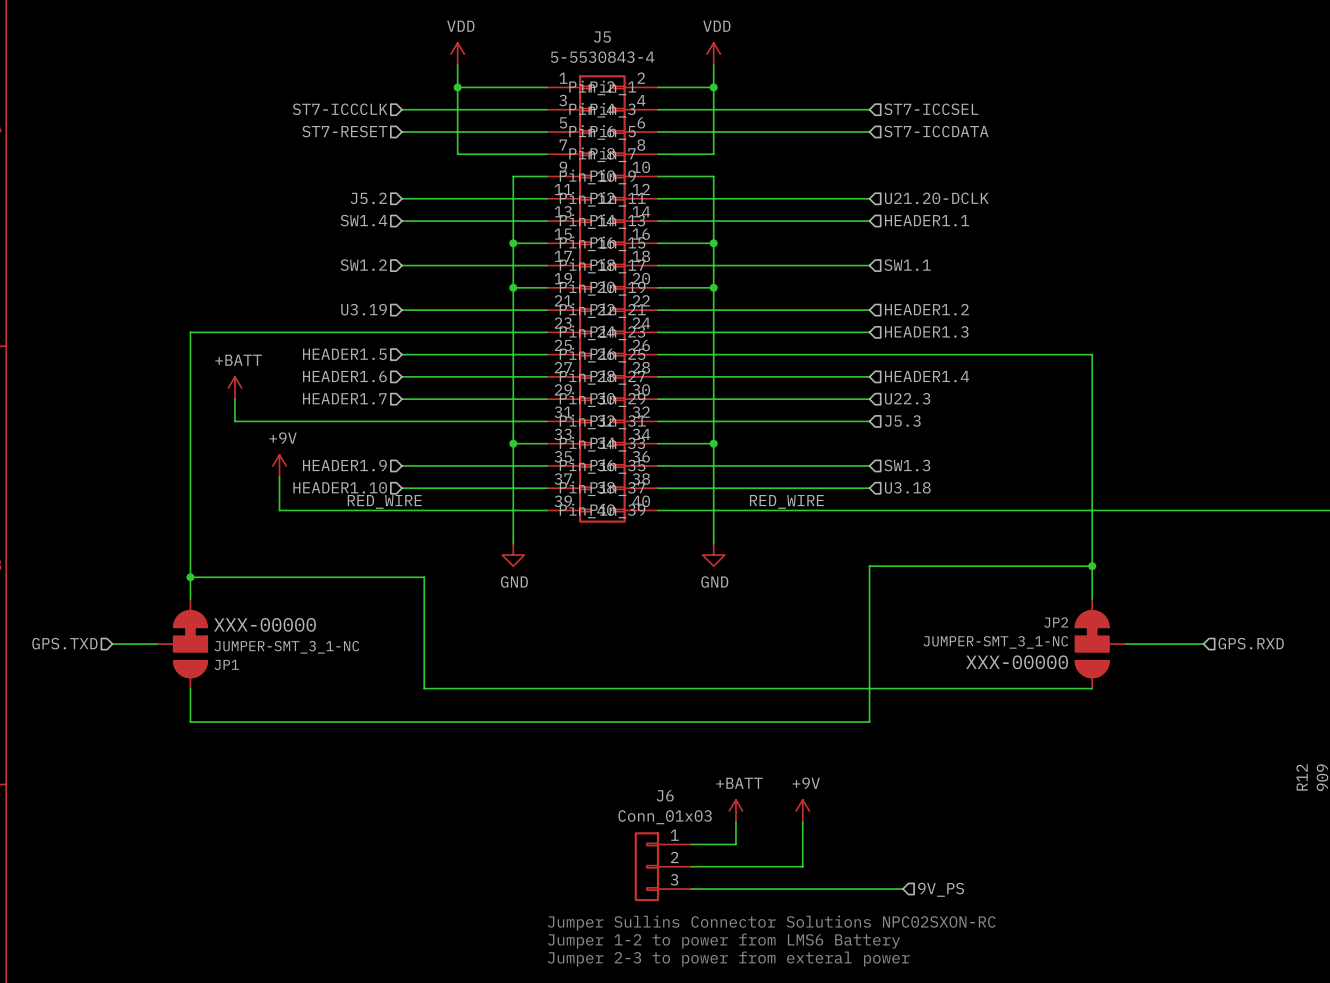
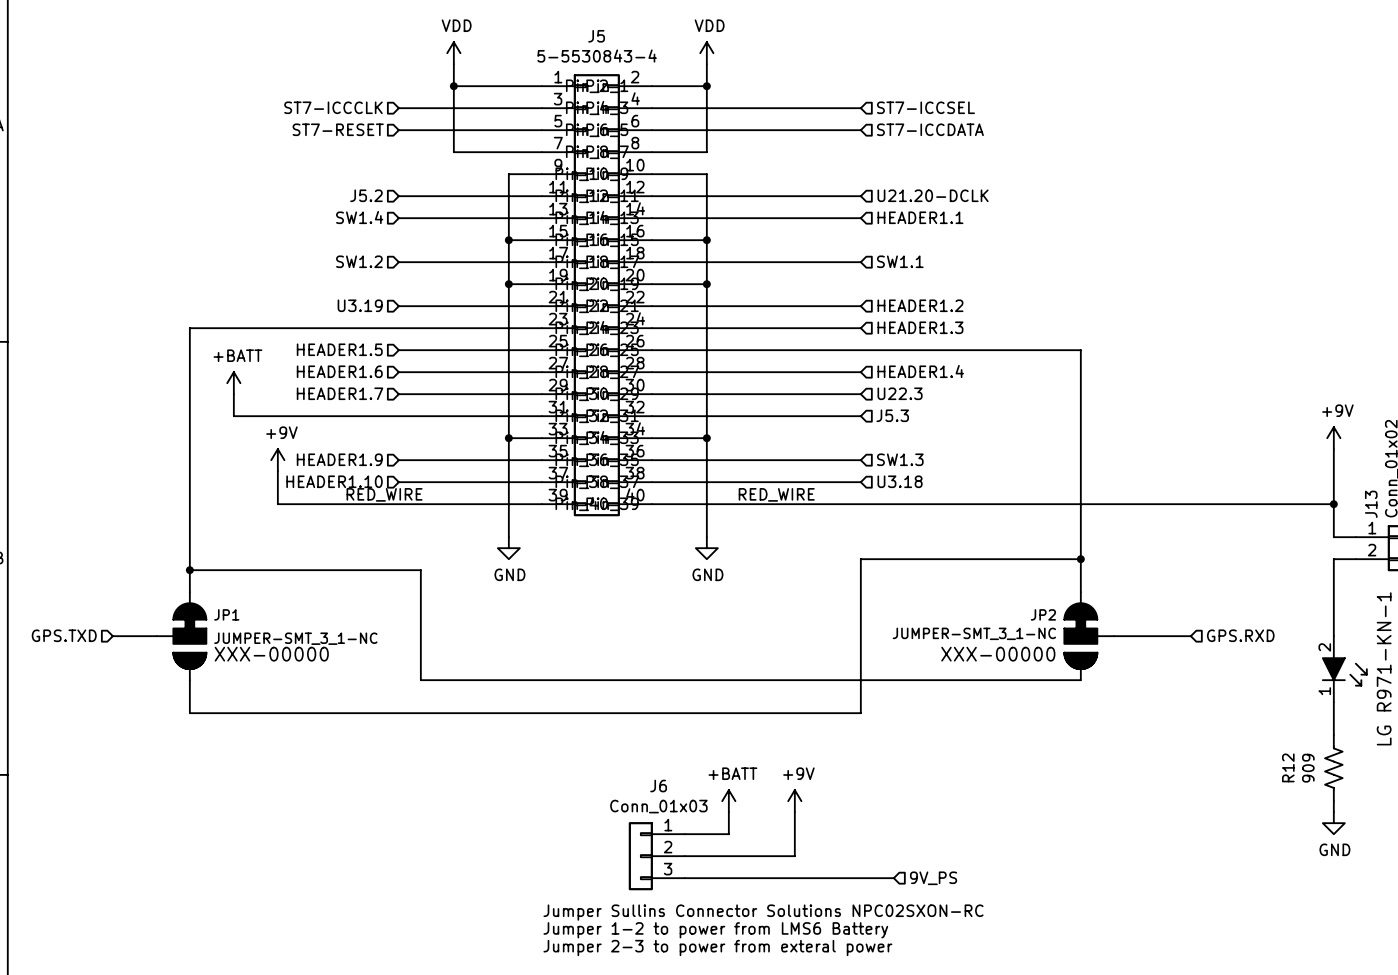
JP1 text position: XXX-00000 (265, 624) -> XXX-00000 (271, 654)
JP1 name position: JP1 (226, 664) -> JP1 (226, 614)

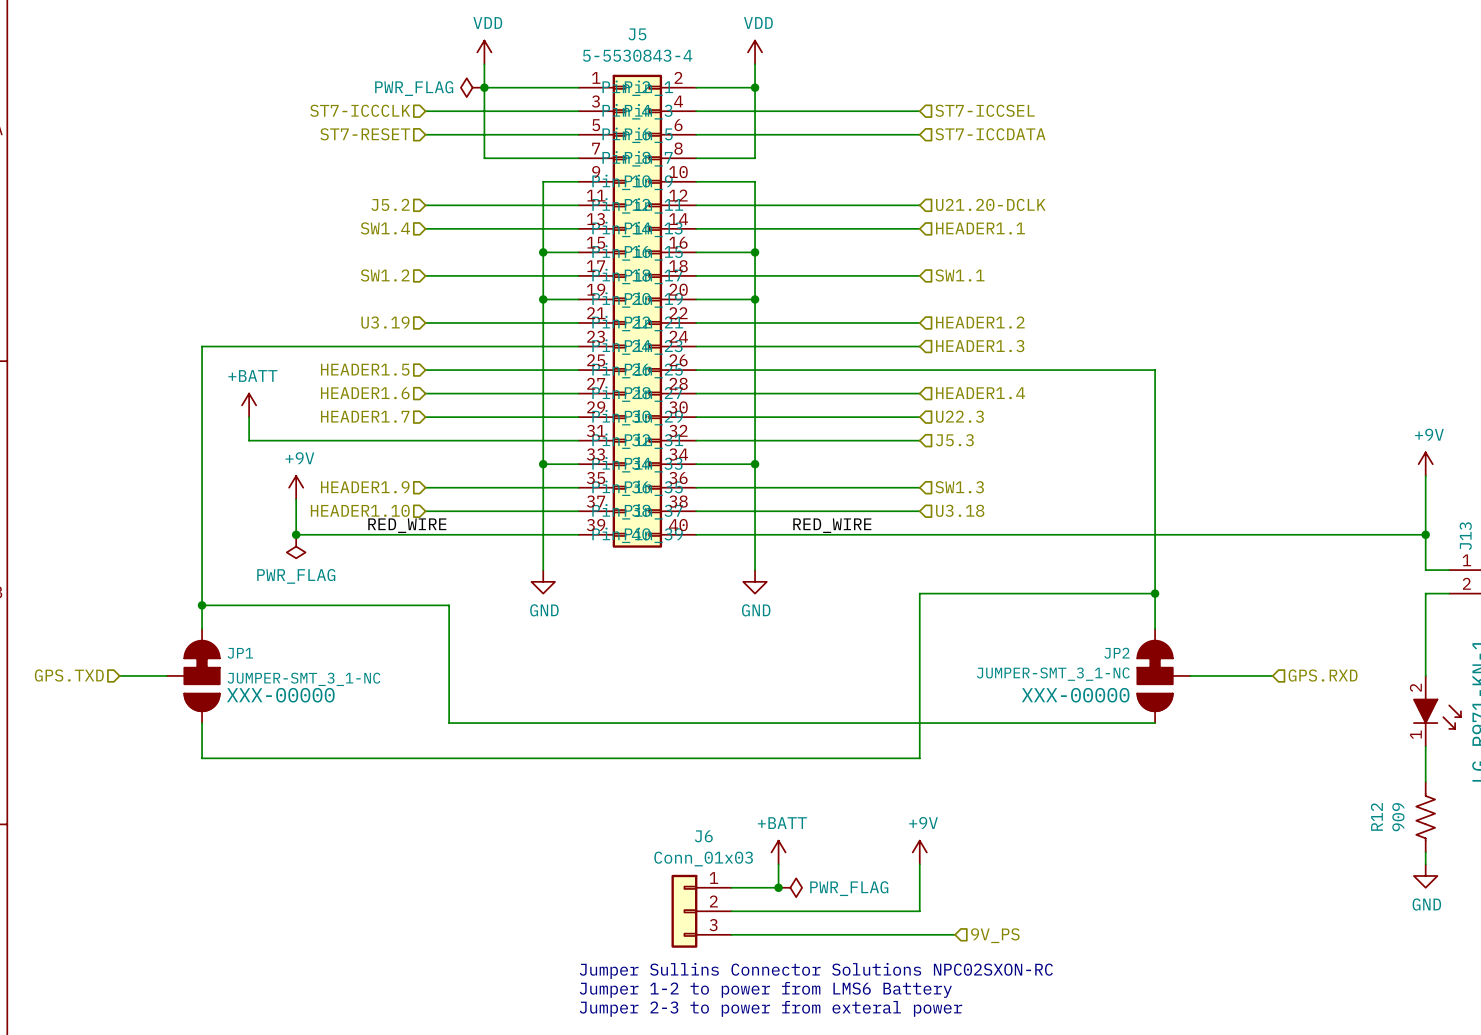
power symbol: none -> PWR_FLAG (472, 87)
junction: none -> (296, 534)
power symbol: none -> PWR_FLAG (296, 546)
power symbol position: +9V (794, 801) -> +9V (919, 852)
wire: (794, 812) (794, 856) -> (919, 864) (919, 911) (849, 911)
junction: none -> (778, 887)
power symbol: none -> PWR_FLAG (790, 887)

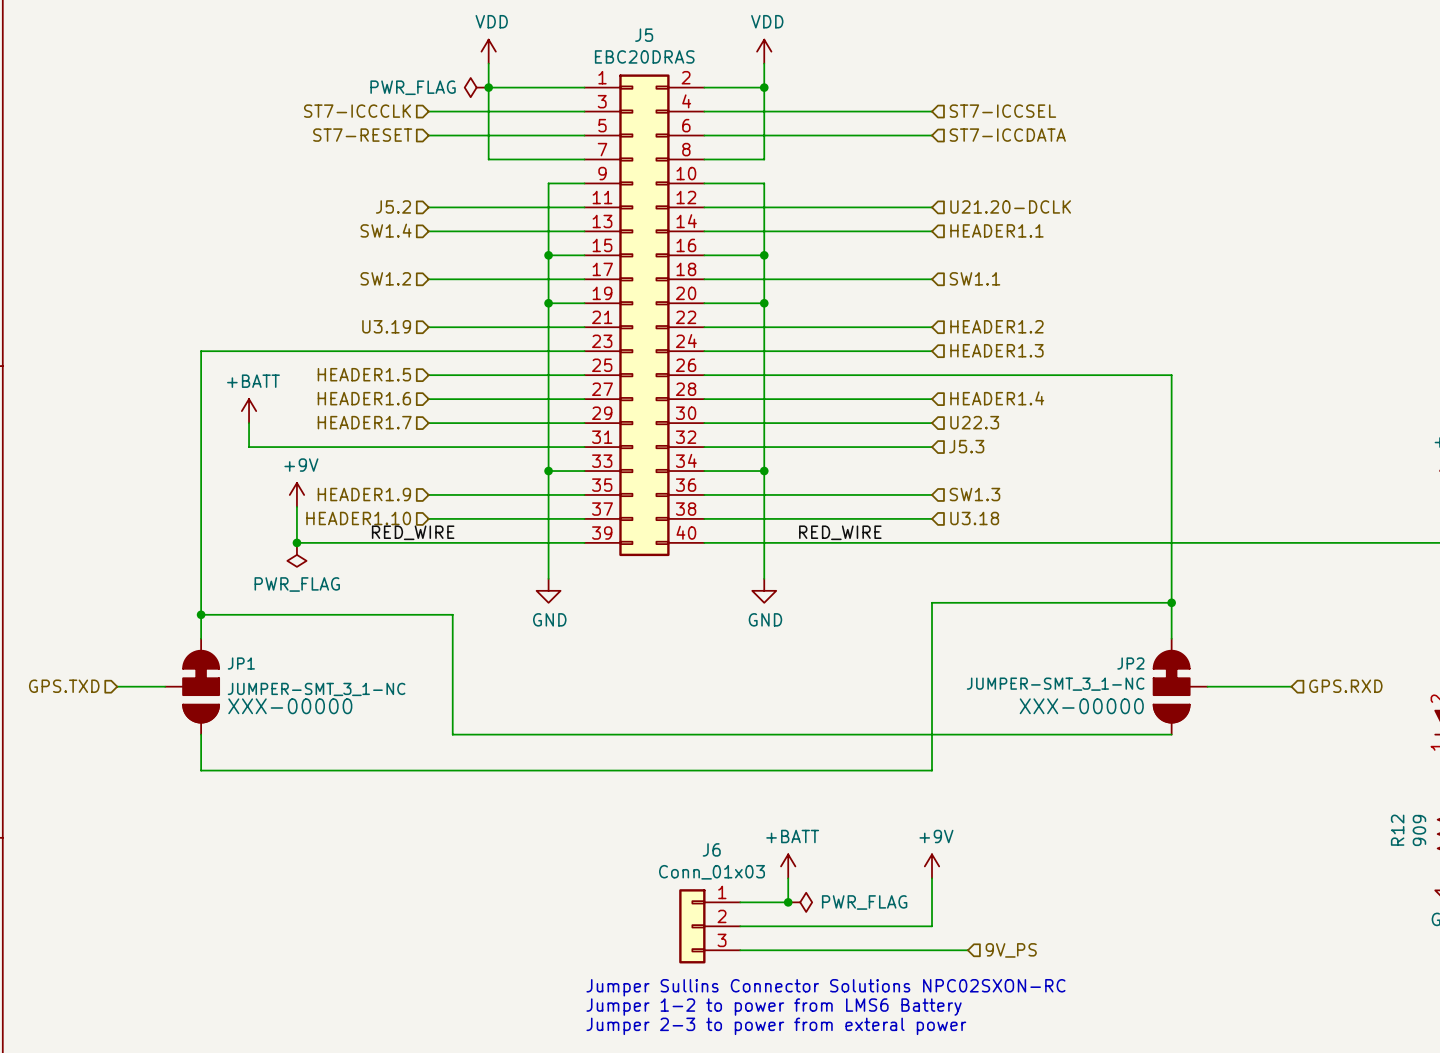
J5 value: 5-5530843-4 (637, 55) -> EBC20DRAS (644, 56)
J5 symbol: [578, 74, 697, 548] -> [584, 74, 705, 557]

